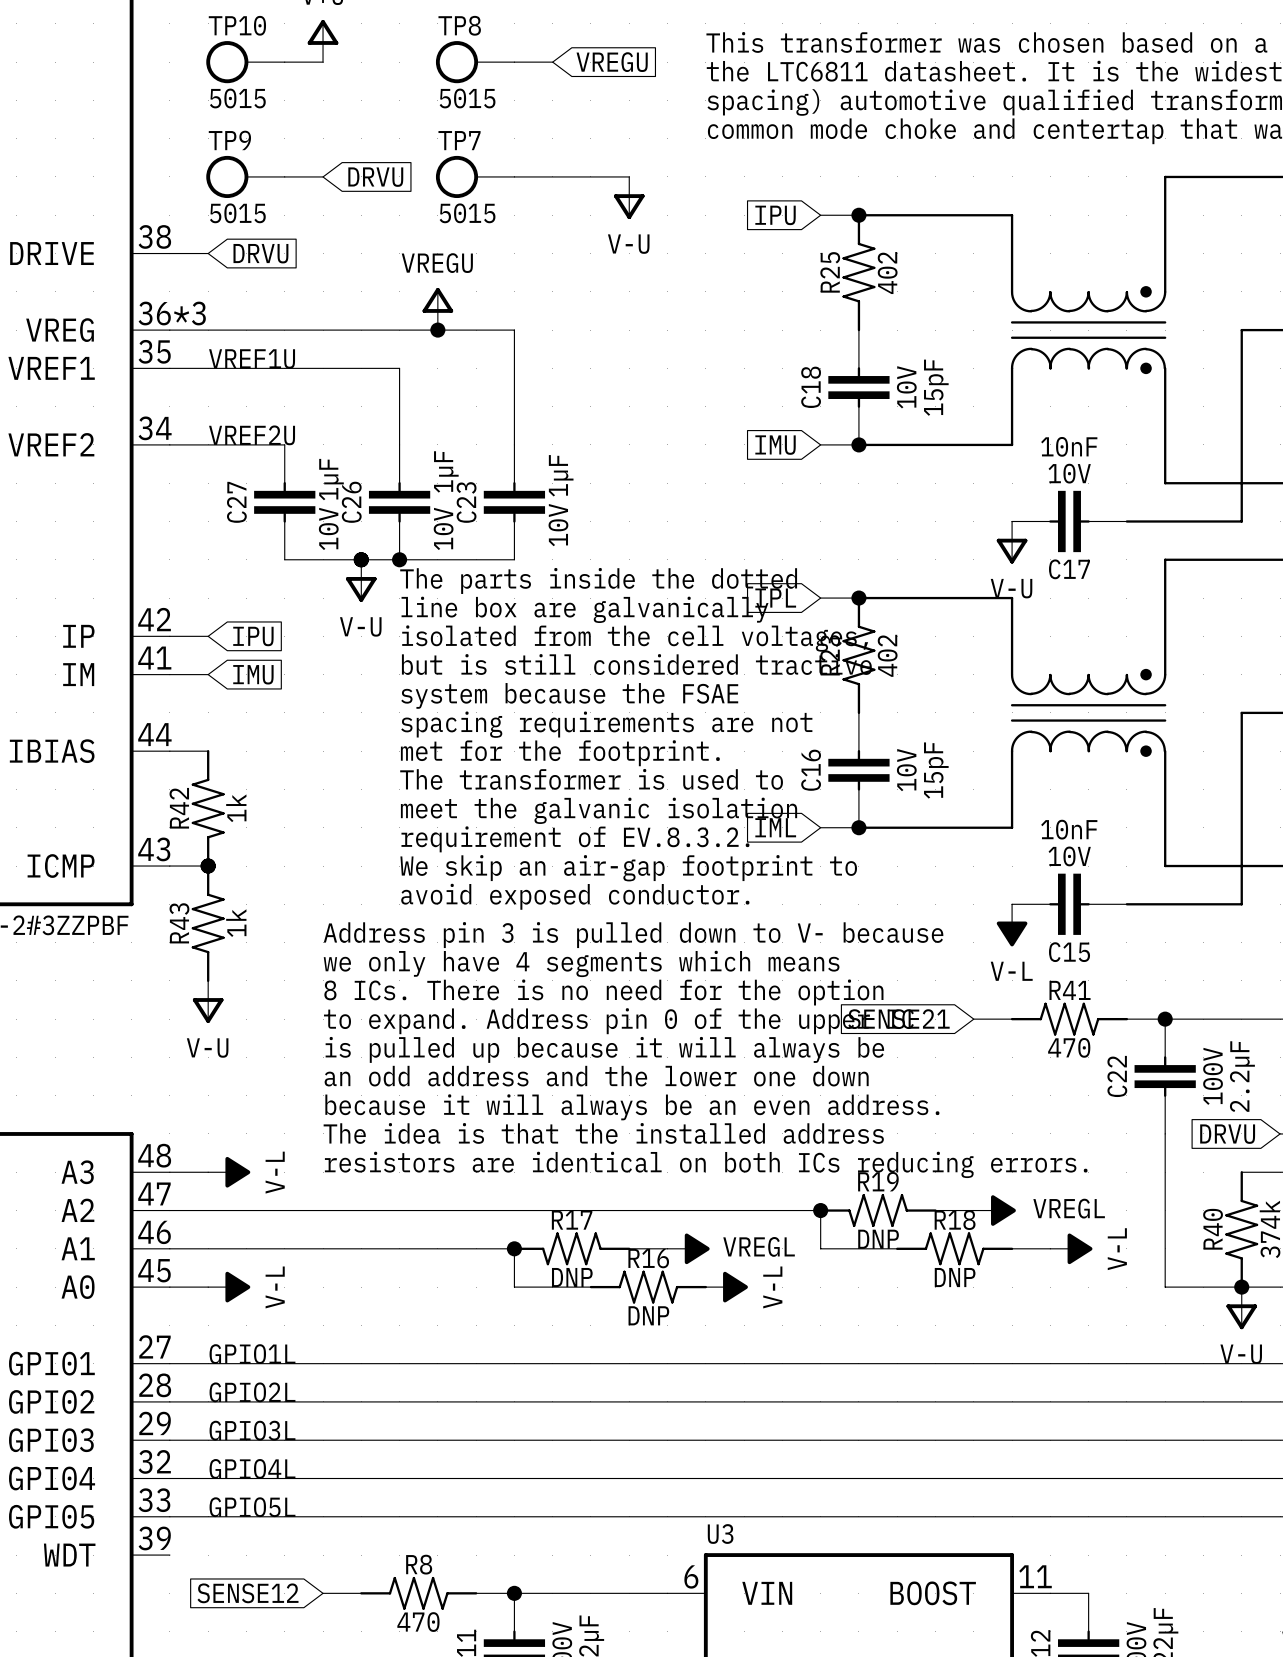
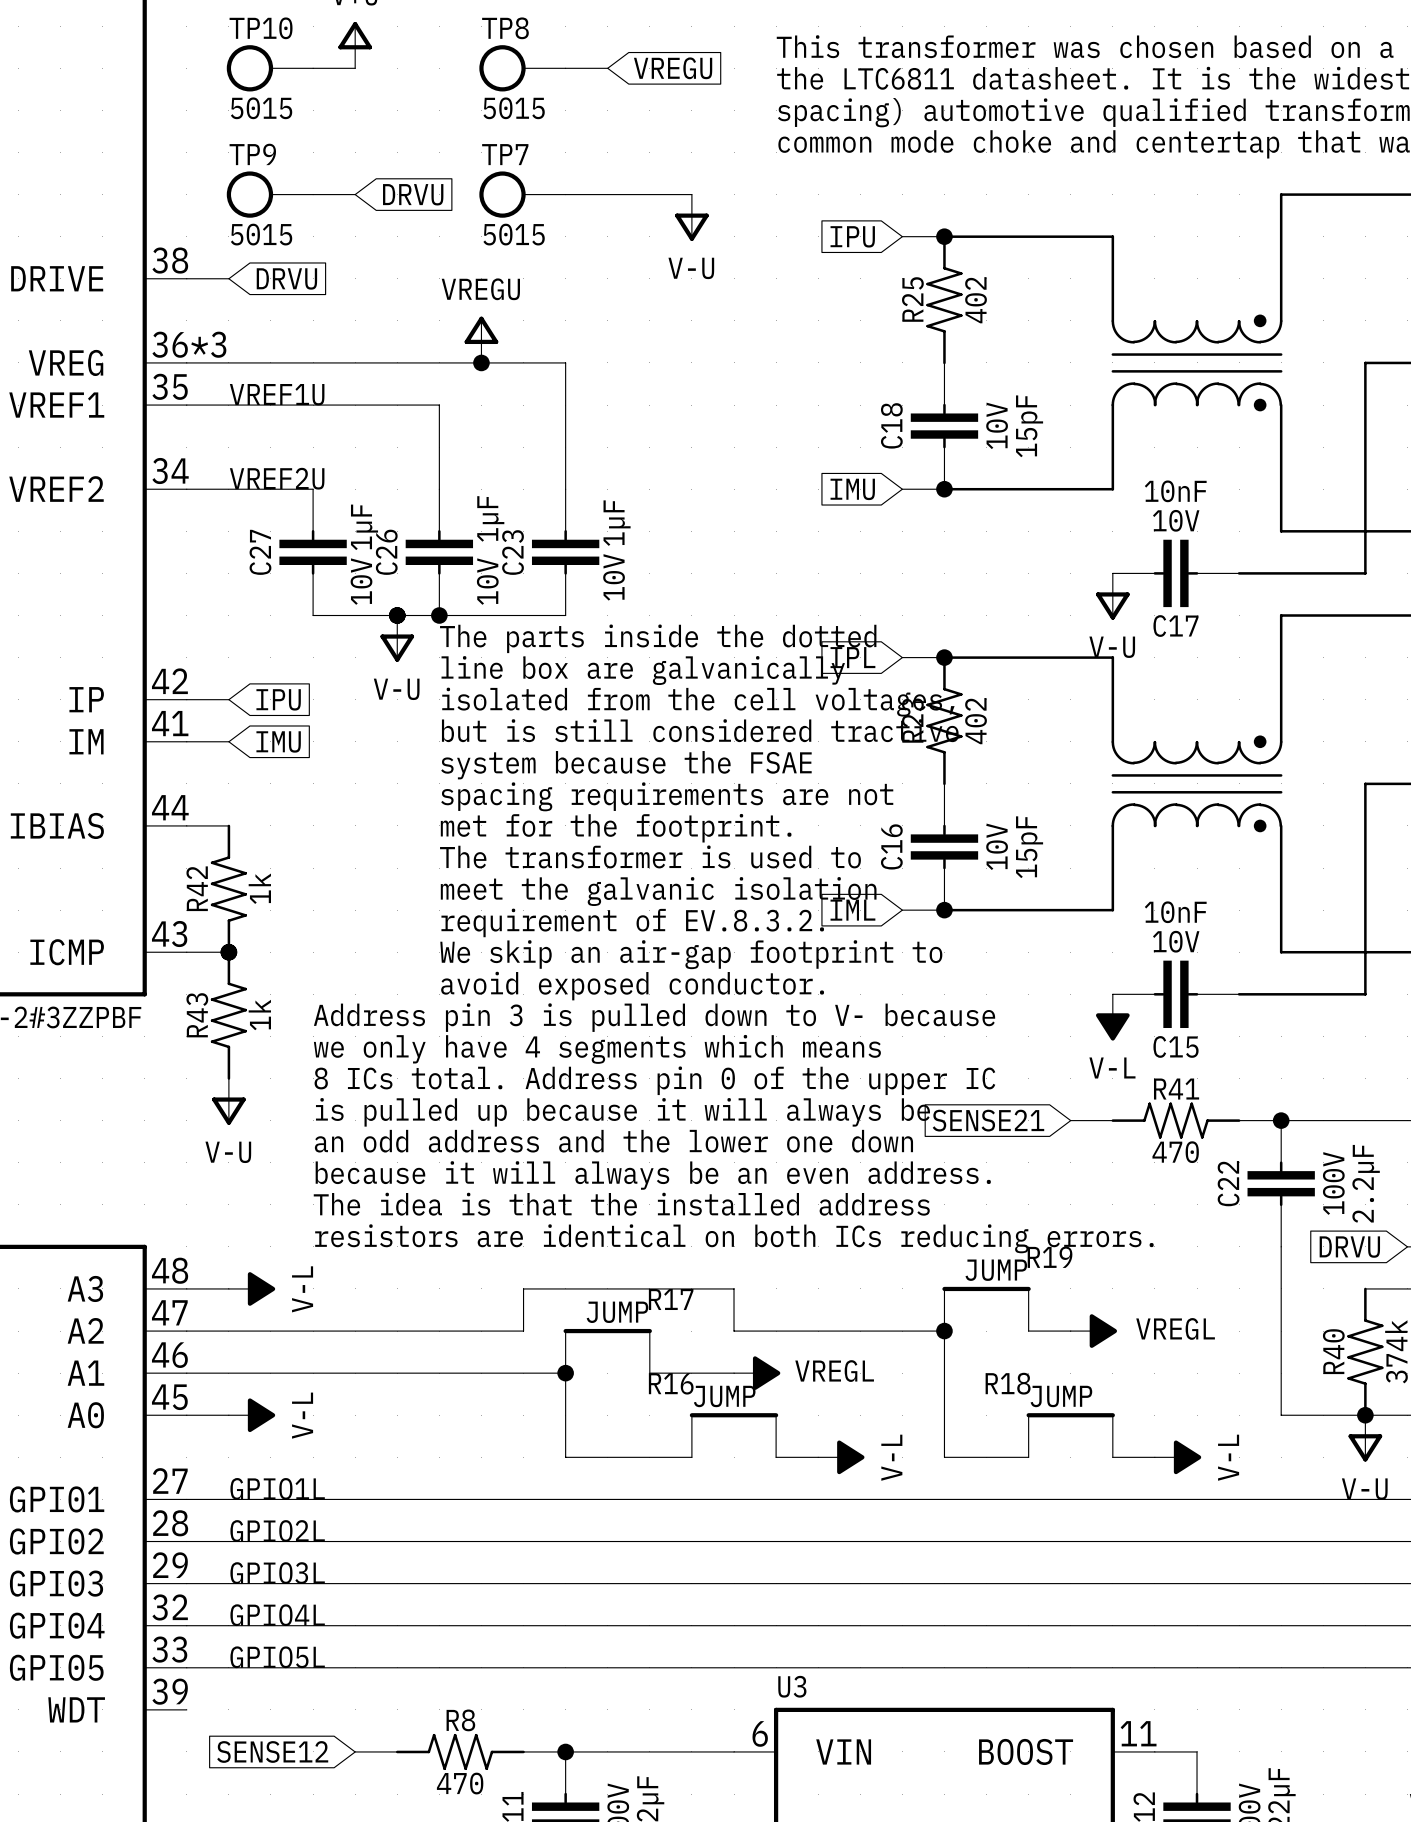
text position: Address pin 3 is pulled down to V- because (633, 935) -> Address pin 3 is pulled down to V- because (654, 1017)
text position: we only have 4 segments which means (581, 963) -> we only have 4 segments which means (597, 1049)
text: 8 ICs. There is no need for the option (603, 992) -> none
text: to expand. Address pin 0 of the upper IC (618, 1021) -> 8 ICs total. Address pin 0 of the upper IC (654, 1080)
text position: is pulled up because it will always be (604, 1049) -> is pulled up because it will always be (622, 1112)
text position: an odd address and the lower one down (596, 1076) -> an odd address and the lower one down (613, 1141)
text position: because it will always be an even address. (632, 1107) -> because it will always be an even address. (653, 1175)
text position: The idea is that the installed address (603, 1133) -> The idea is that the installed address (621, 1204)
text position: resistors are identical on both ICs reducing errors. (706, 1164) -> resistors are identical on both ICs reducing errors. (734, 1238)
R19 name position: R19 (878, 1181) -> R19 (1050, 1257)
R19 symbol: [819, 1194, 937, 1228] -> [942, 1286, 1031, 1332]
wire: (476, 1210) (667, 1210) -> (523, 1331) (523, 1288) (734, 1288) (734, 1331)
wire: (820, 1210) (820, 1248) (897, 1248) -> (902, 1331) (944, 1331) (944, 1457) (1028, 1457)
junction position: (820, 1210) -> (944, 1331)
R17 name position: R17 (572, 1220) -> R17 (671, 1299)
R18 name position: R18 (955, 1220) -> R18 (1008, 1383)
R17 symbol: [513, 1232, 631, 1266] -> [563, 1328, 652, 1374]
R18 symbol: [896, 1232, 1014, 1266] -> [1026, 1413, 1115, 1458]
R19 text: DNP (878, 1239) -> none
wire: (1012, 1248) (1050, 1248) -> (1112, 1457) (1154, 1457)
power symbol position: V-L (1071, 1248) -> V-L (1178, 1457)
R16 name position: R16 (648, 1258) -> R16 (671, 1383)
R16 symbol: [589, 1270, 707, 1304] -> [689, 1413, 779, 1458]
R17 text: DNP (572, 1277) -> none
R18 text: DNP (955, 1277) -> none
wire: (514, 1287) (590, 1287) -> (565, 1415) (565, 1457) (691, 1457)
power symbol position: V-L (726, 1287) -> V-L (841, 1457)
R16 text: DNP (648, 1315) -> none
wire: none -> (776, 1457) (818, 1457)

